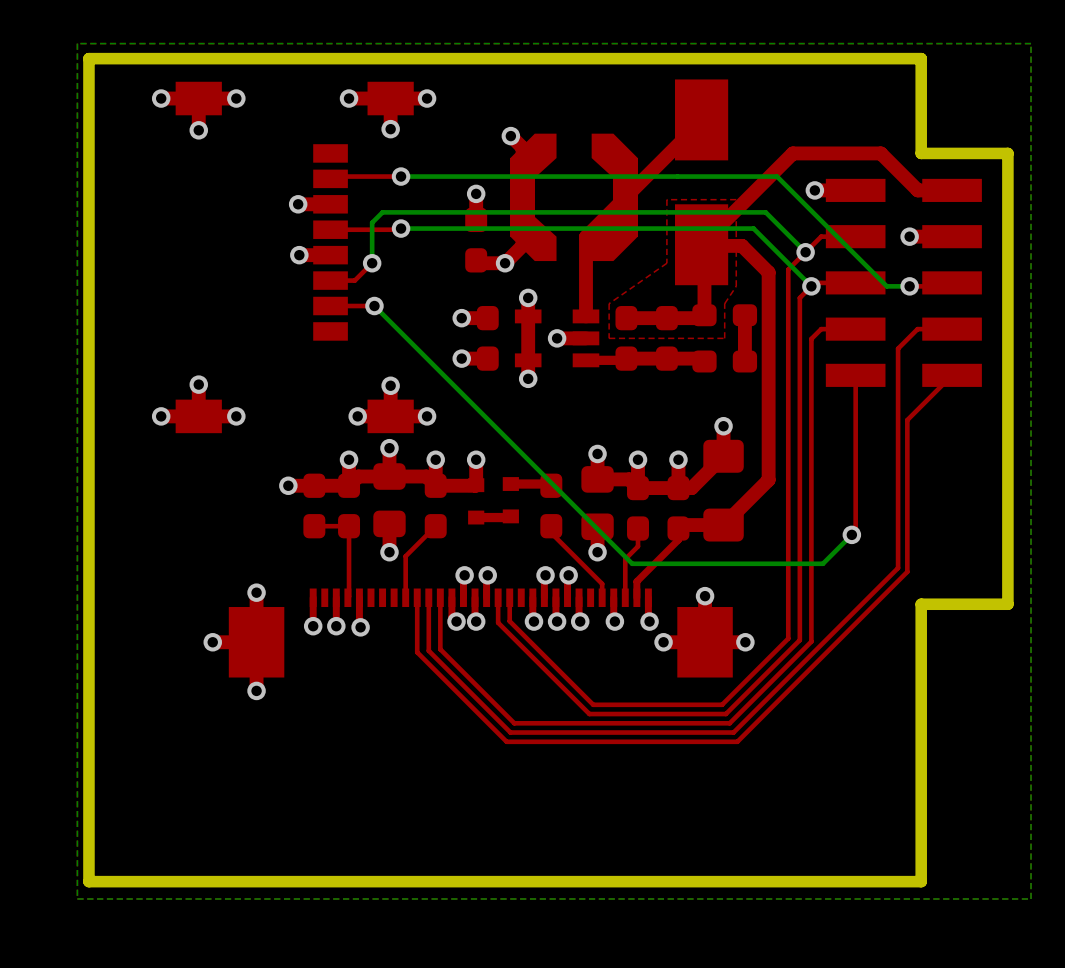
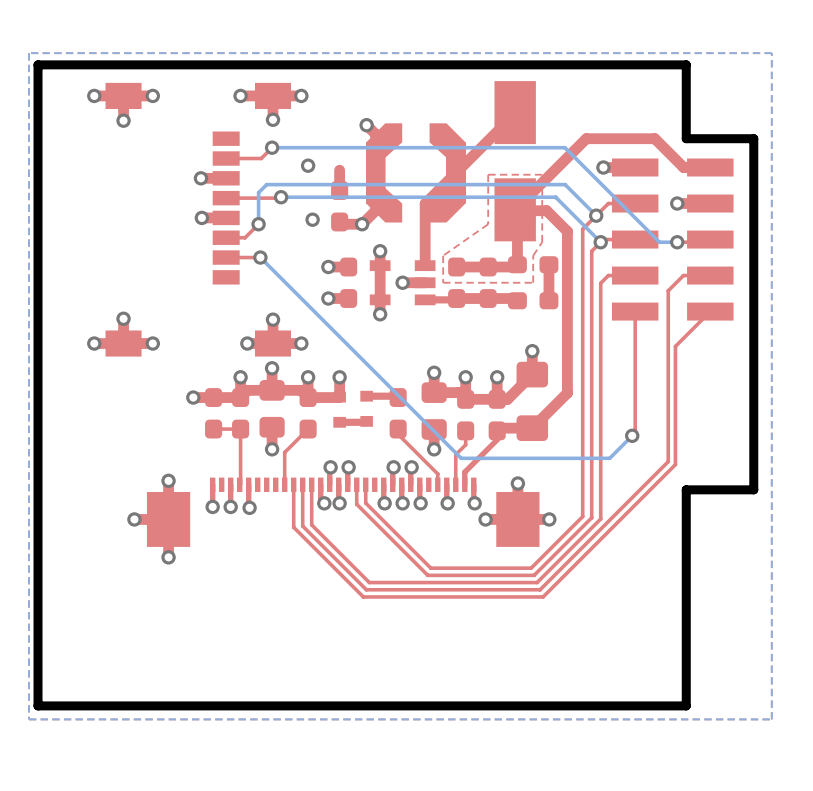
top track: (401, 176) (332, 176) (330, 178) -> (272, 147) (261, 158) (226, 158)
via position: (401, 176) -> (272, 147)
bottom track: (777, 176) (401, 176) -> (573, 156) (564, 147) (272, 147)
via: none -> (308, 165)
via: (476, 193) -> none
via: none -> (312, 219)

